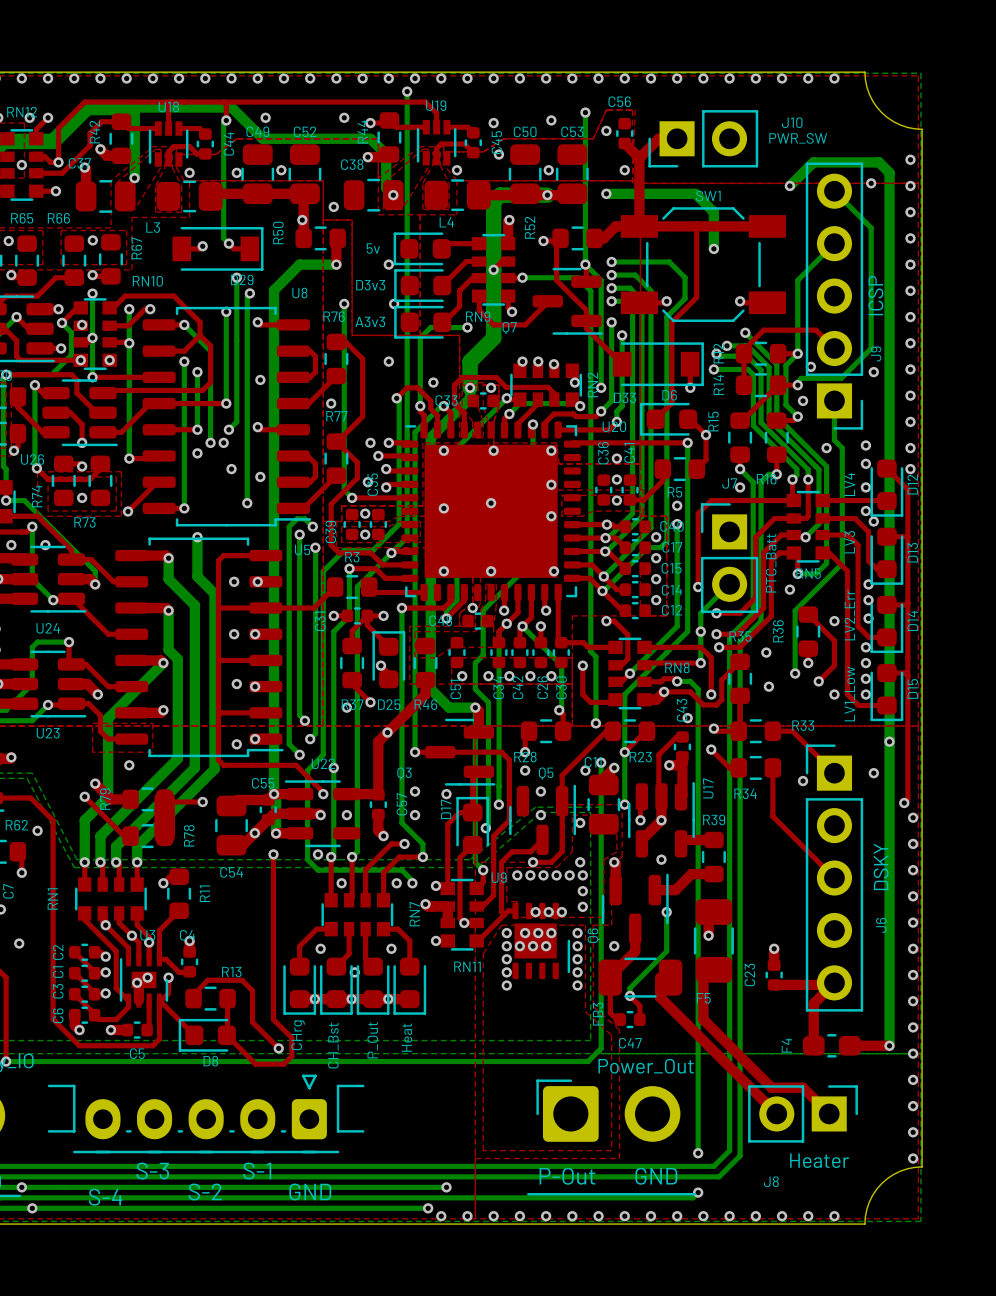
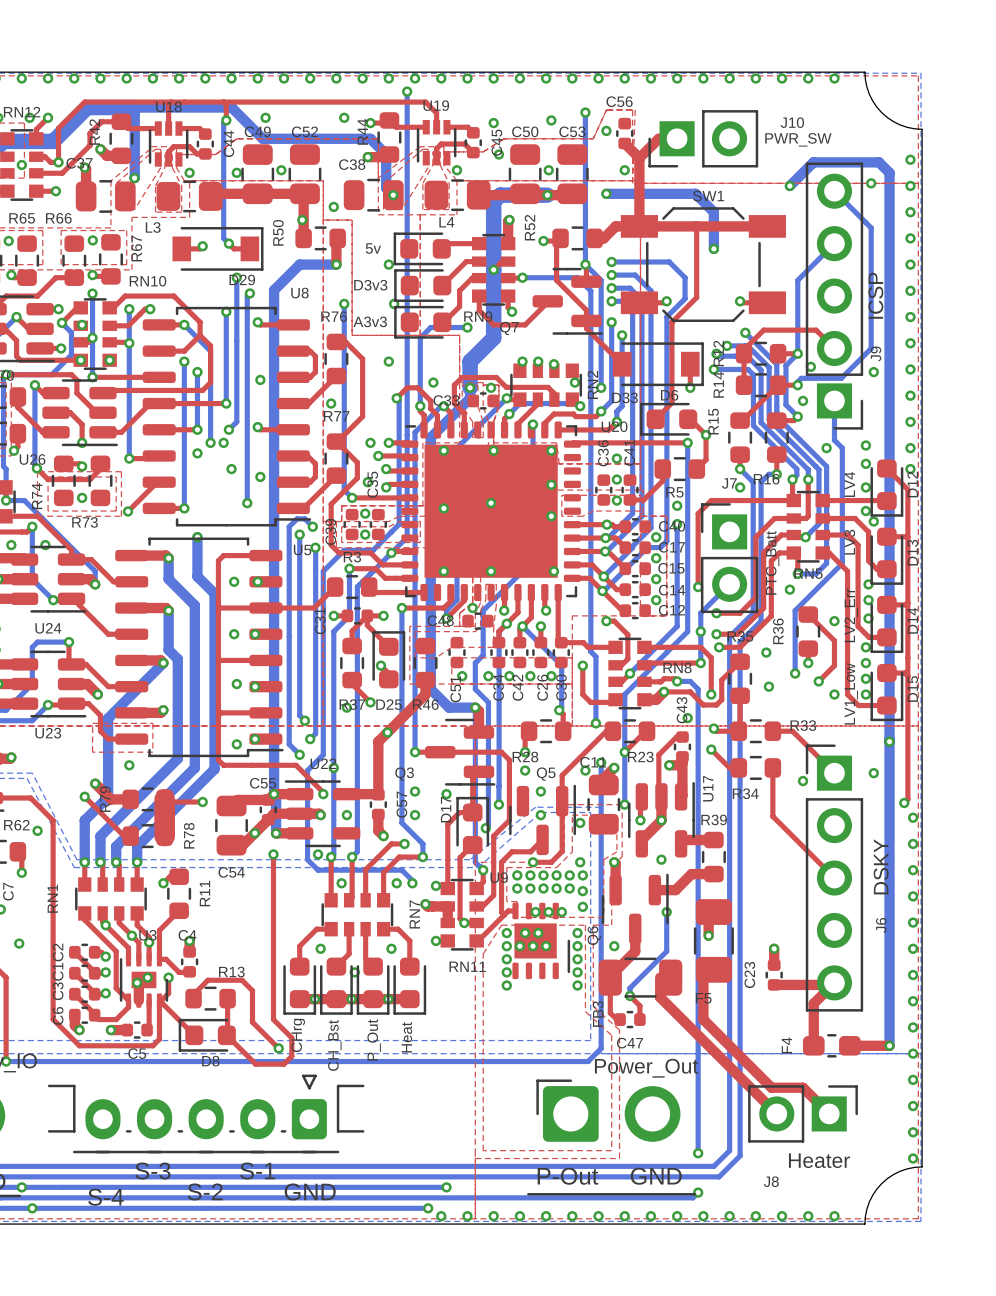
via: none -> (517, 888)
via: none -> (530, 888)
via: none -> (543, 888)
via: none -> (556, 888)
via: none -> (569, 888)
via: (551, 933) -> none

